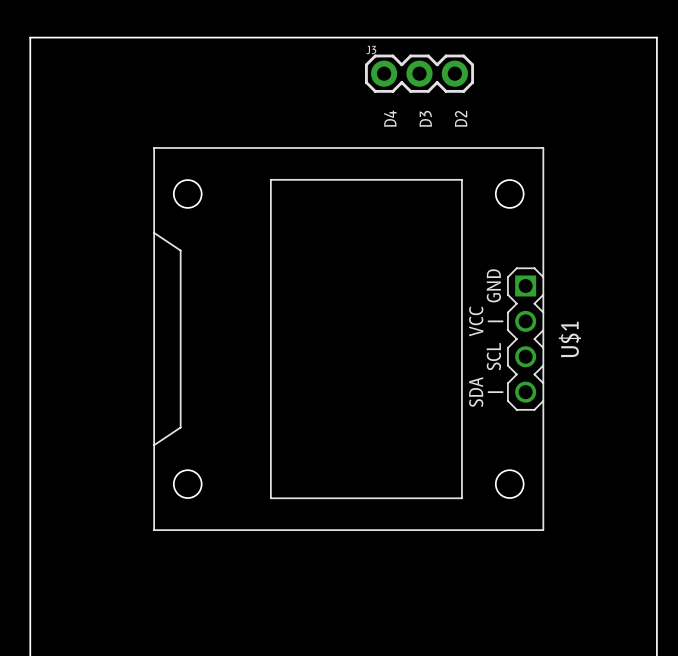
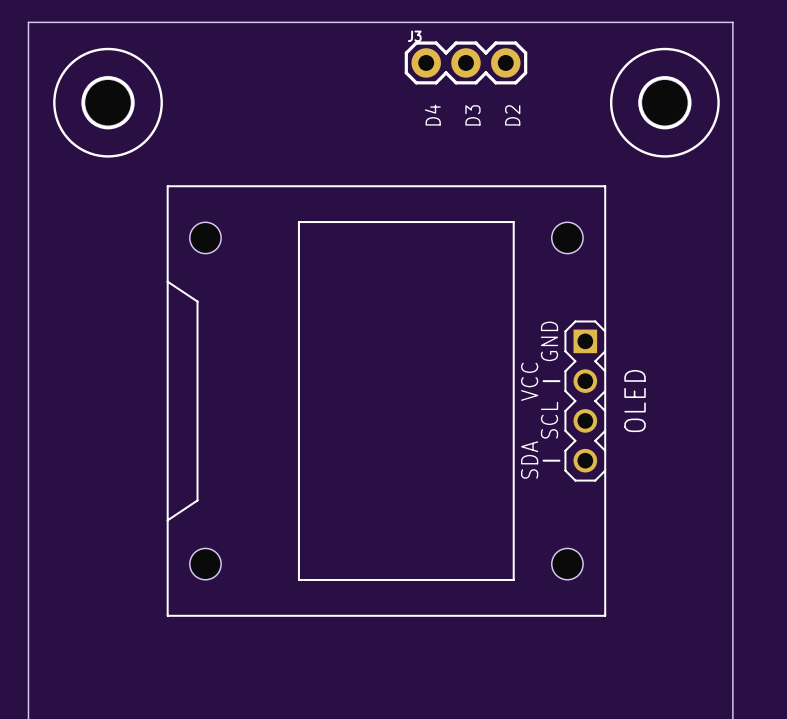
part: none -> (108, 102)
part: none -> (664, 102)
U$1: (348, 339) -> none
OLED: none -> (386, 401)

